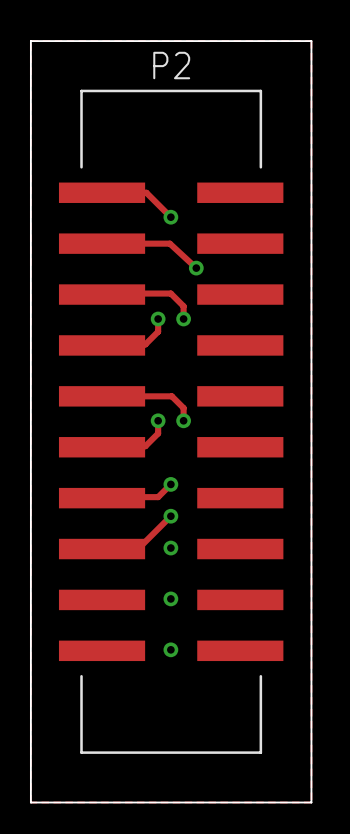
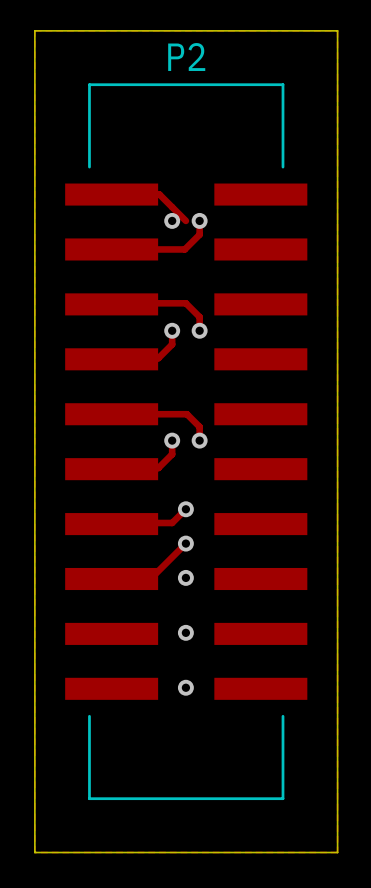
via: none -> (172, 220)
via: (170, 217) -> none
via: none -> (199, 220)
track: (169, 243) (196, 268) -> (184, 249) (199, 234) (199, 220)
via: (196, 268) -> none

